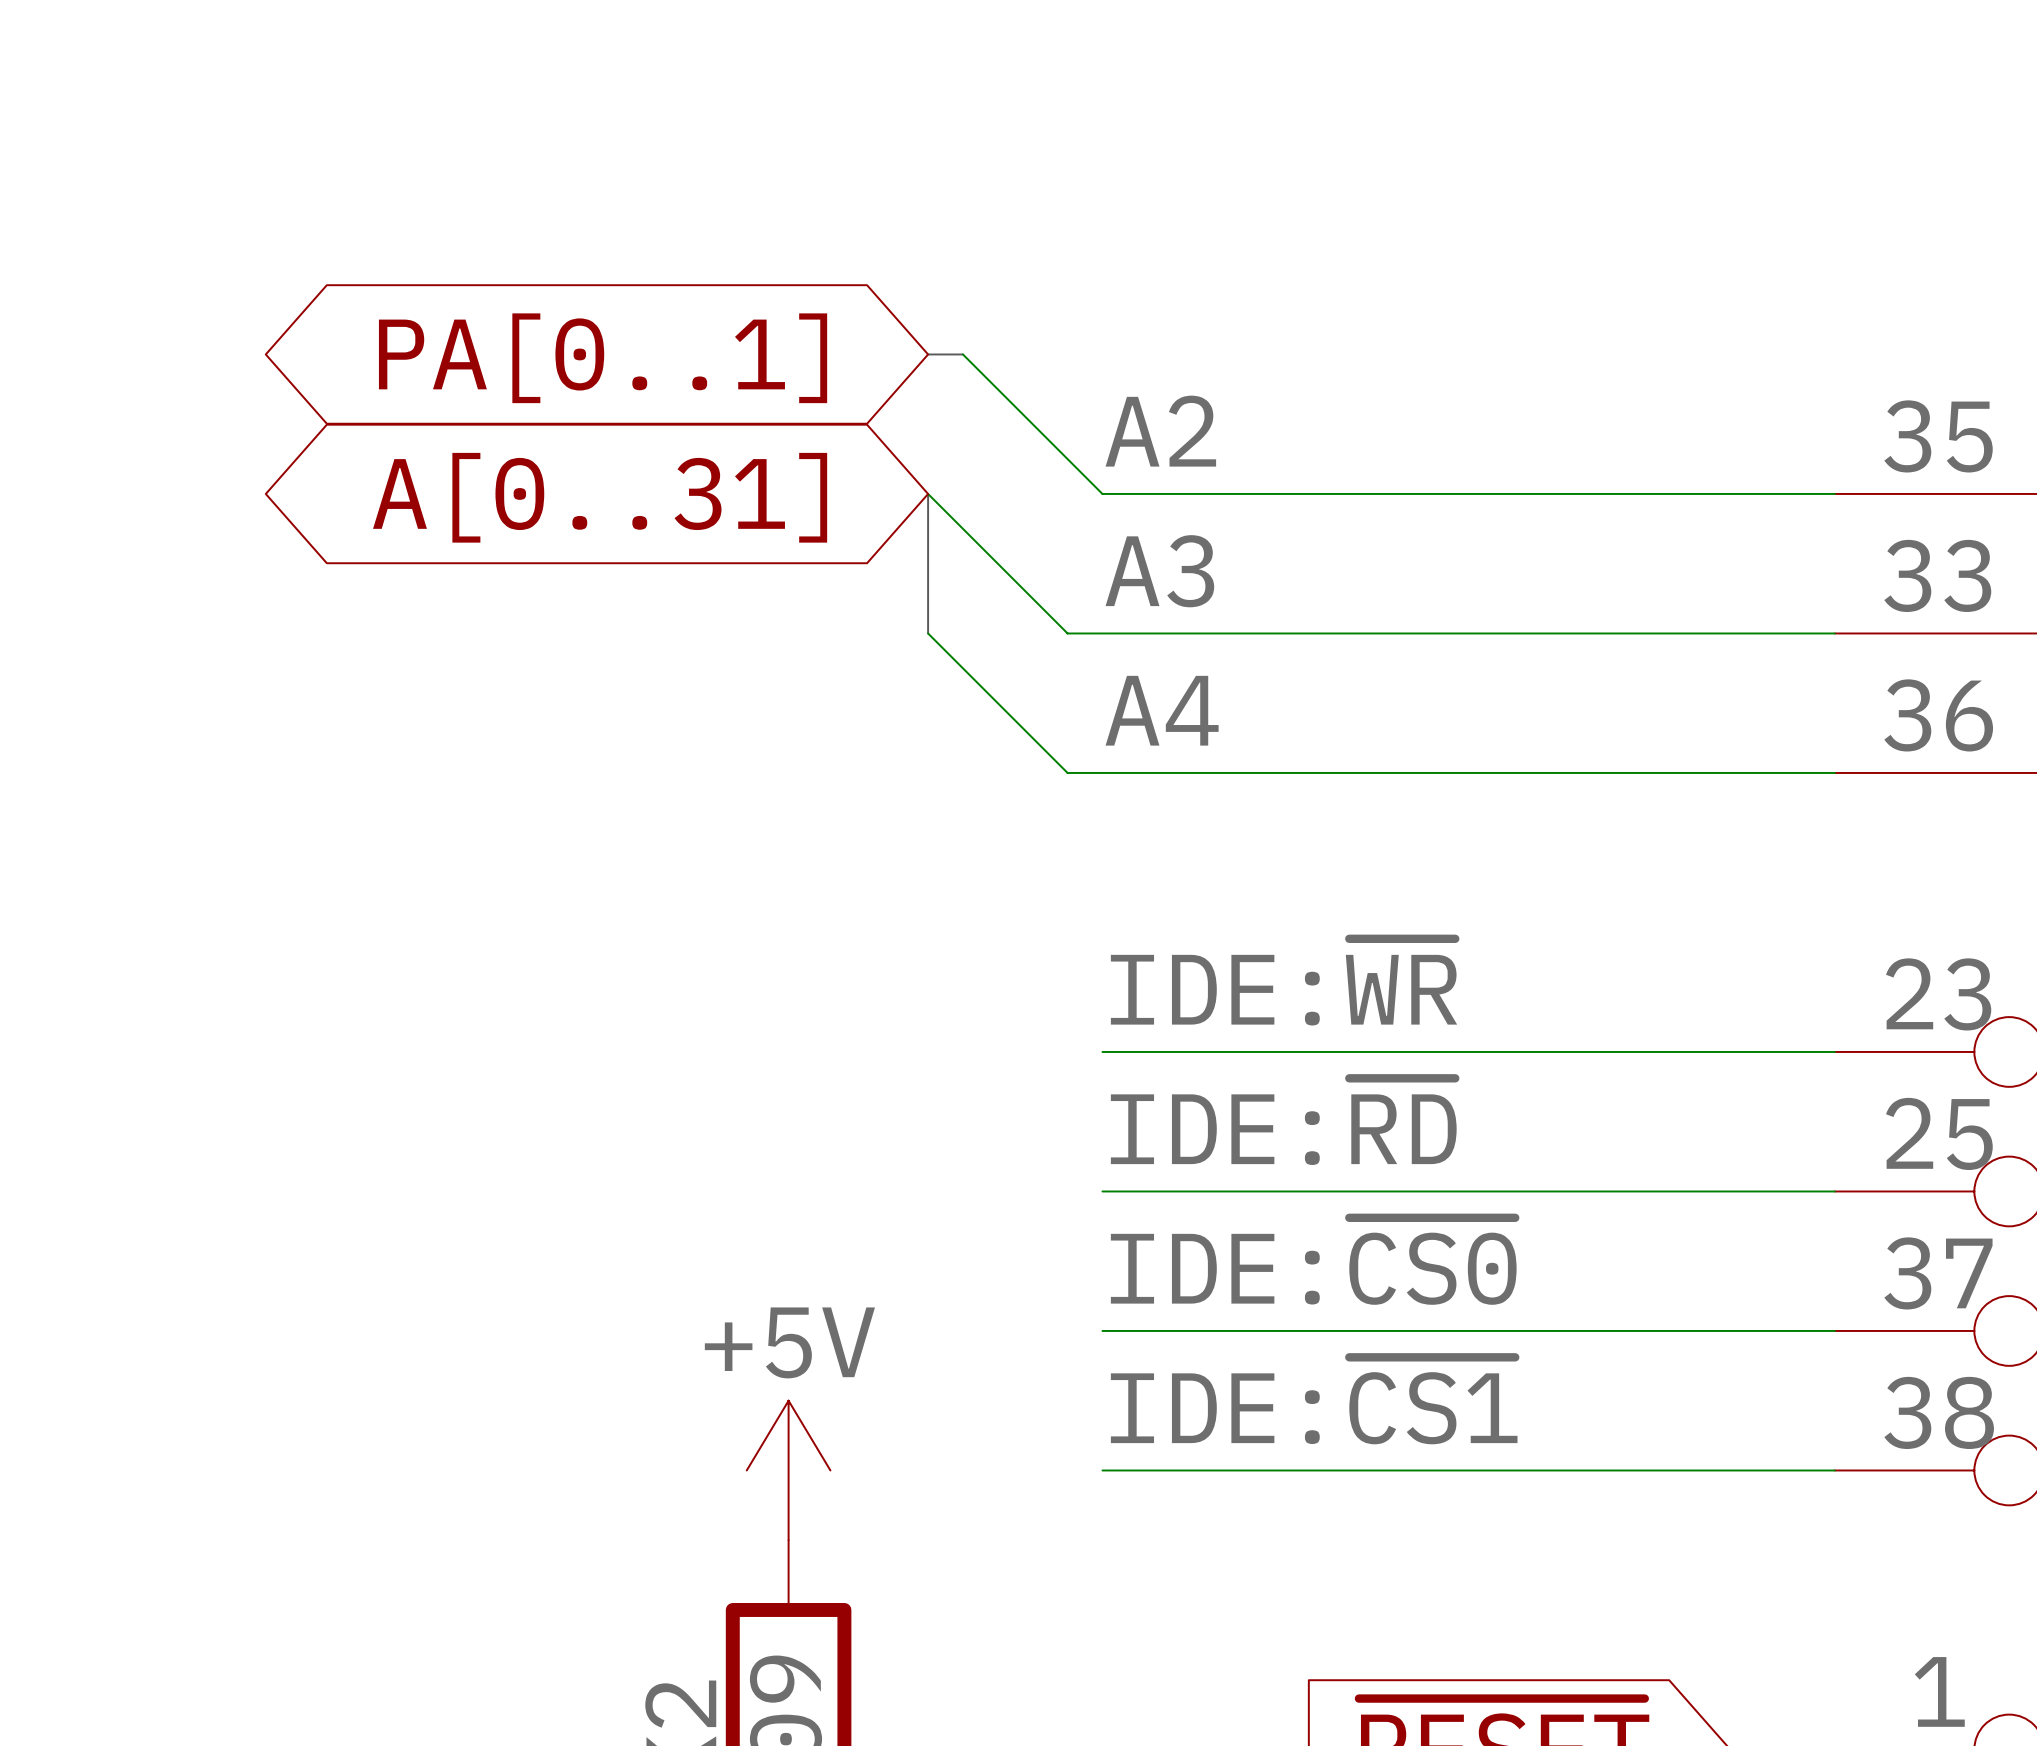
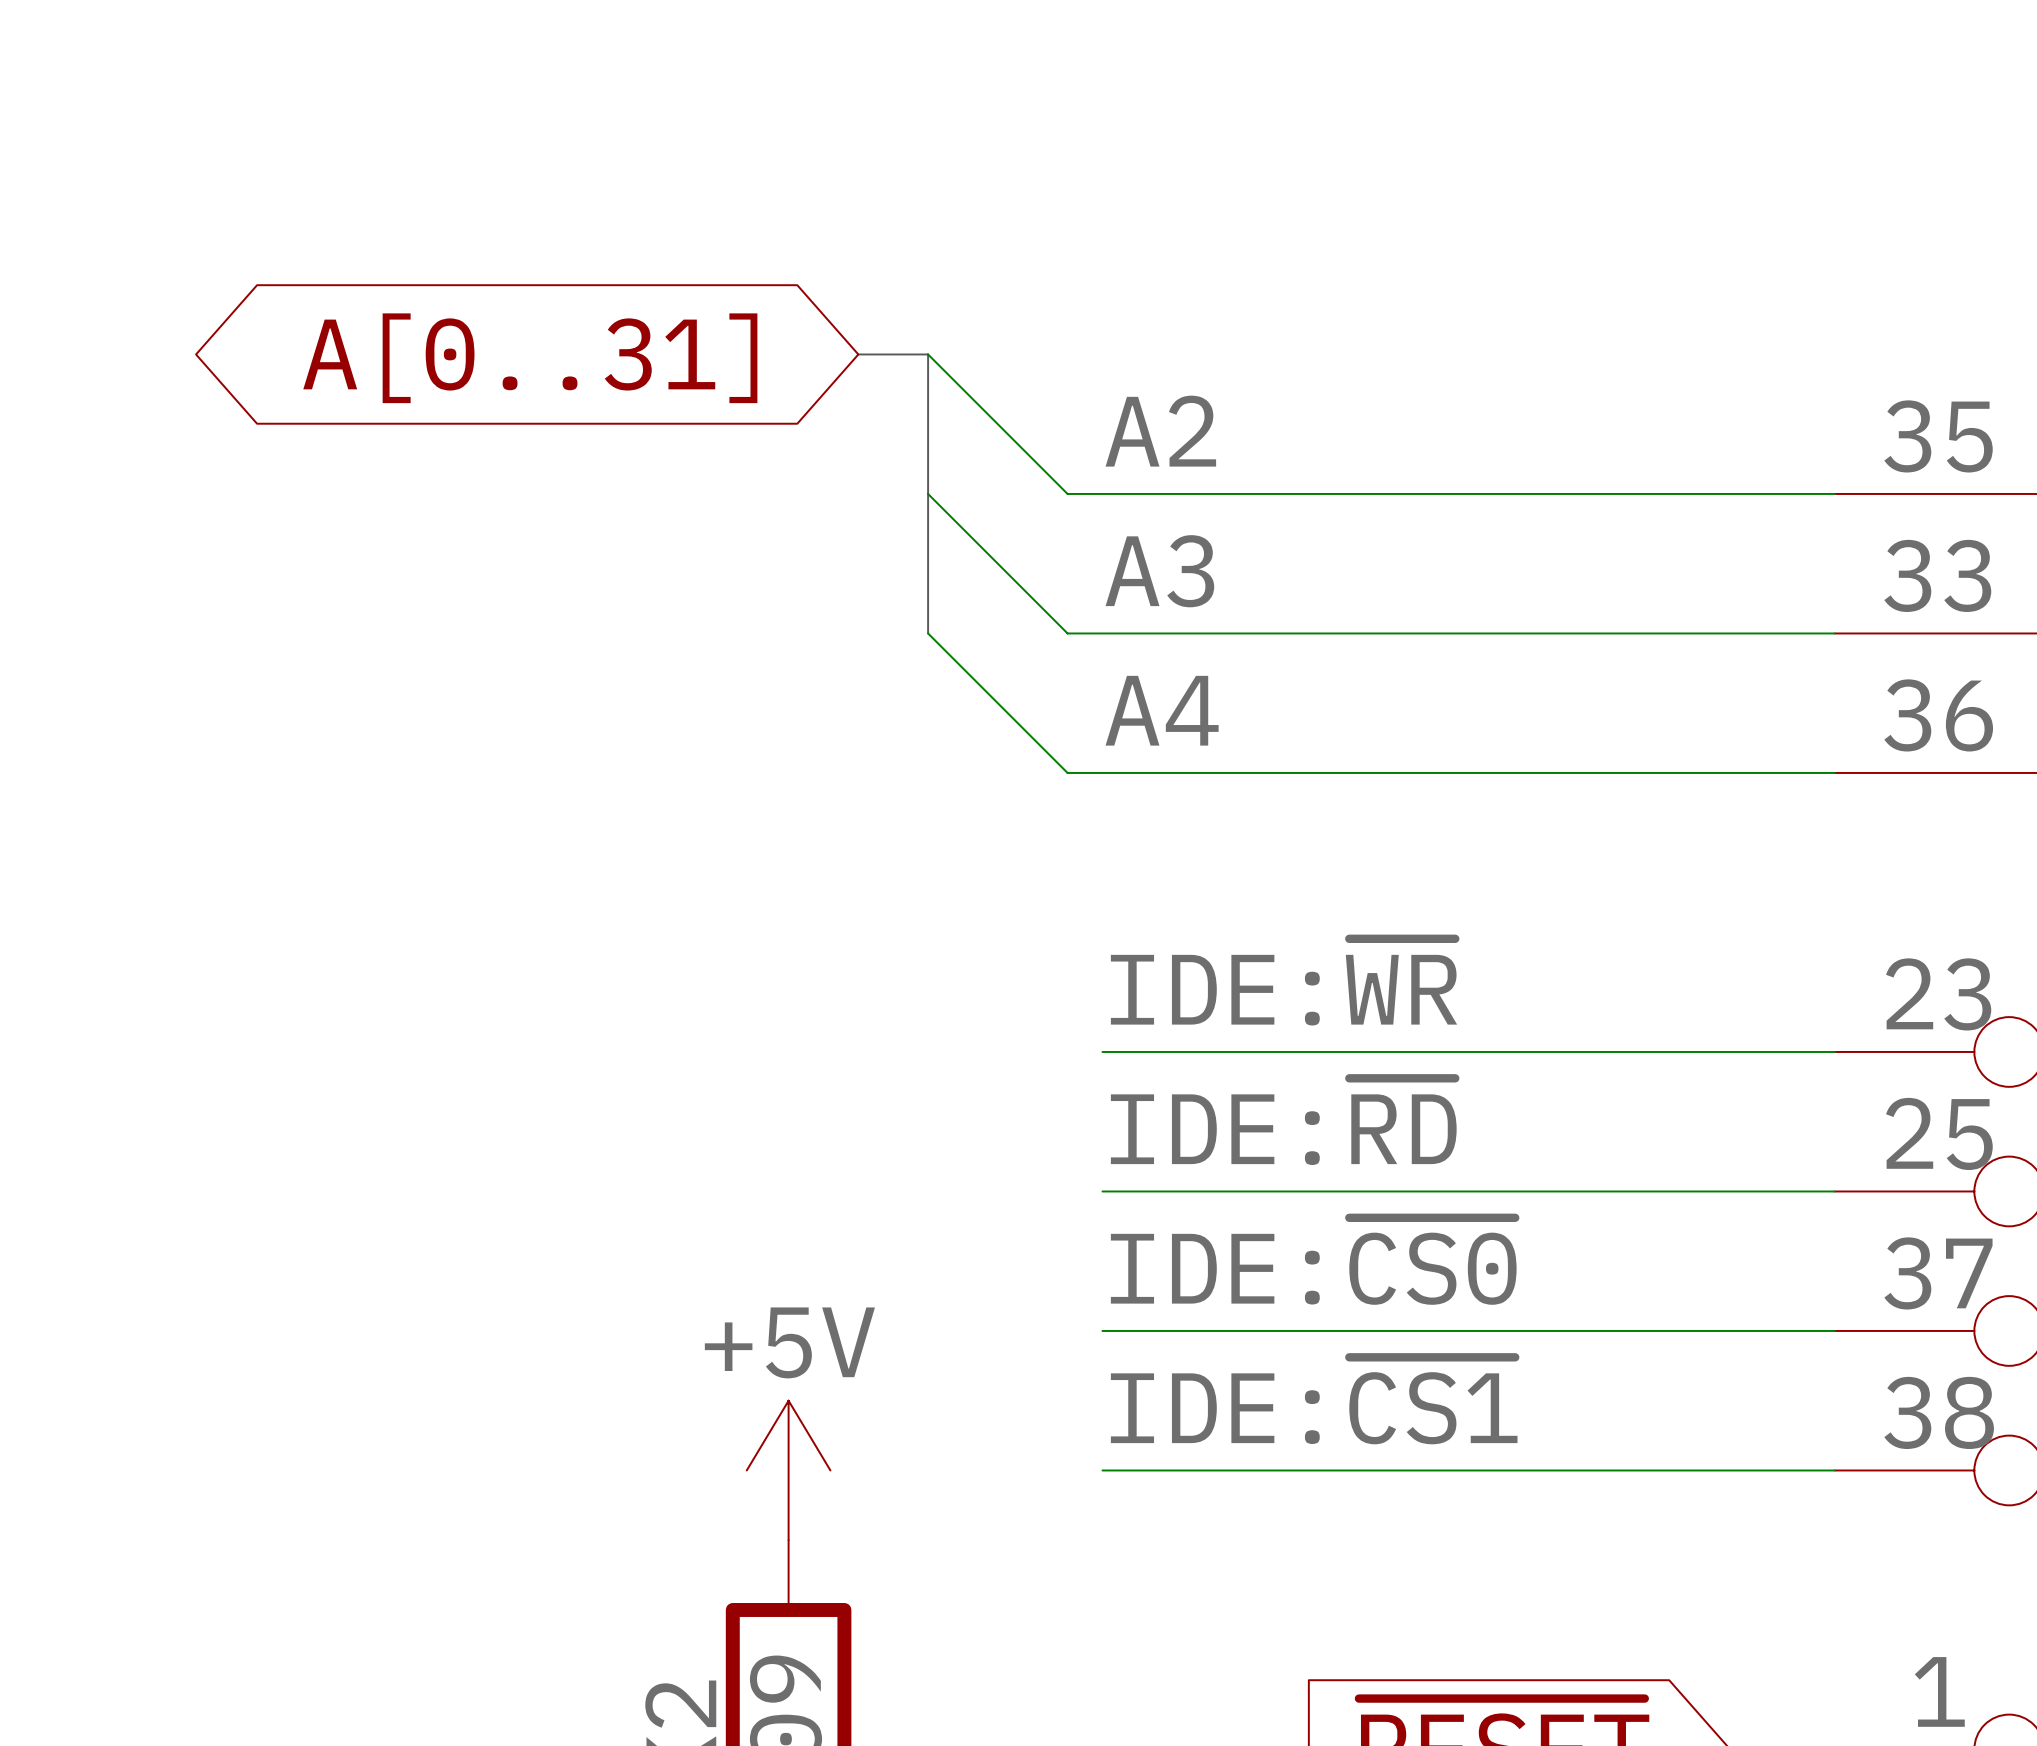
bus: none -> (858, 354) (928, 354) (928, 493)
bus: (928, 354) (962, 354) -> none
wire: (962, 354) (1102, 493) -> (928, 354) (1067, 493) (1102, 493)
global label: PA[0..1] (603, 358) -> none
global label position: A[0..31] (600, 497) -> A[0..31] (530, 358)

